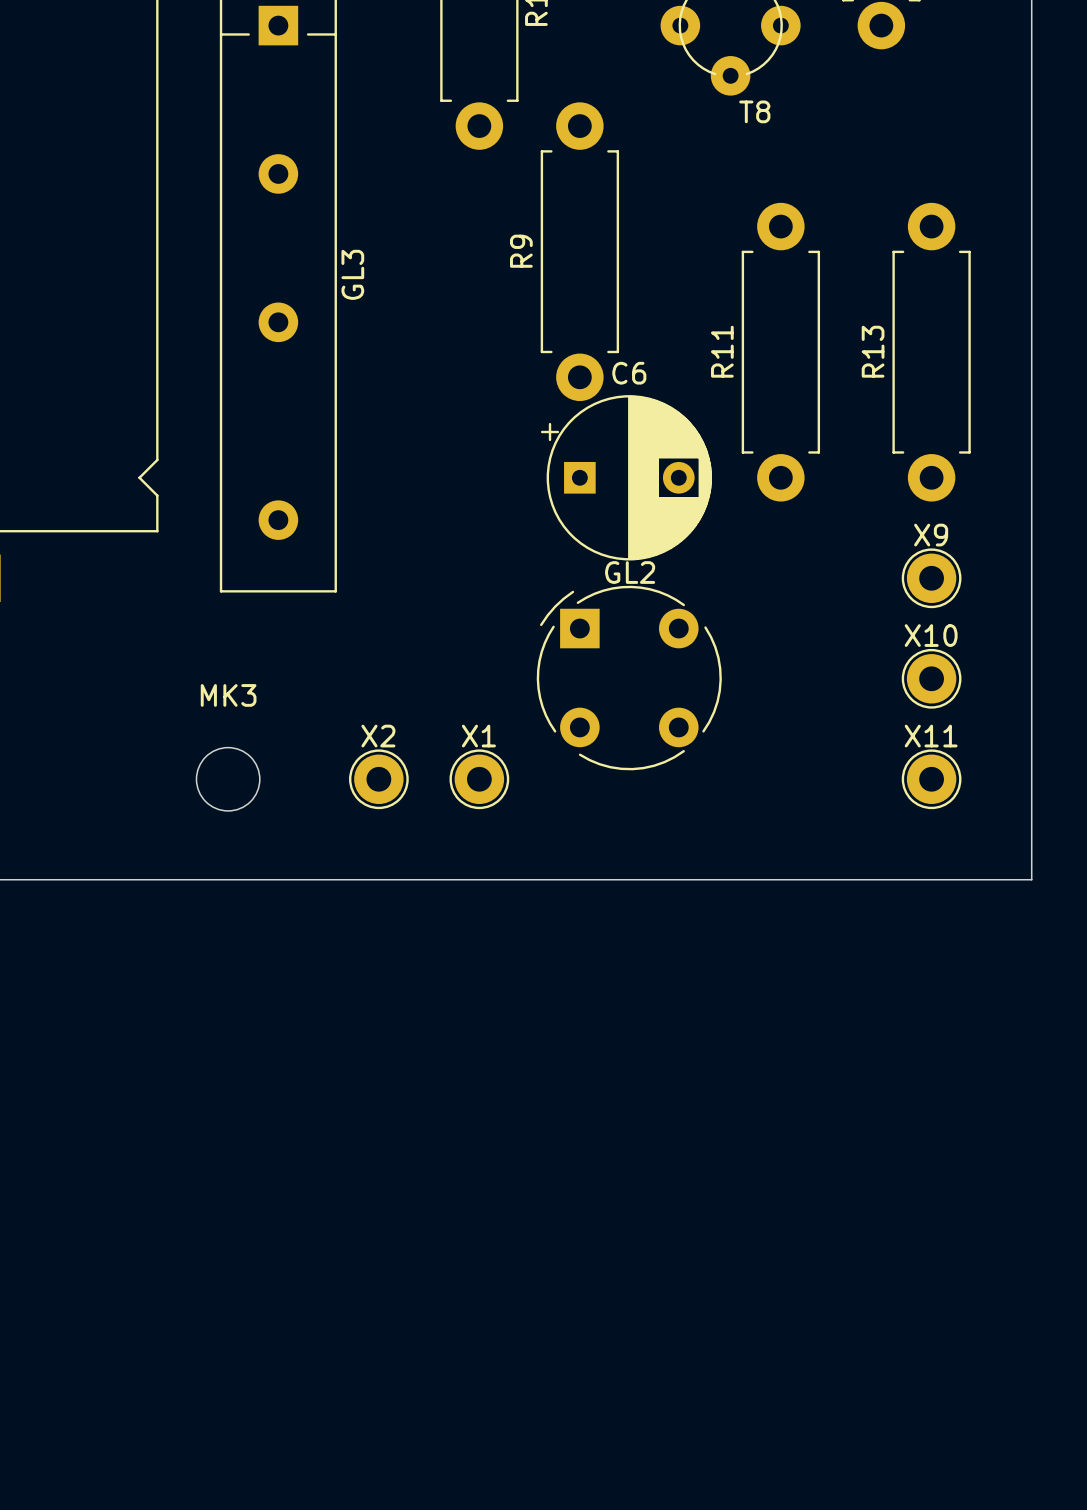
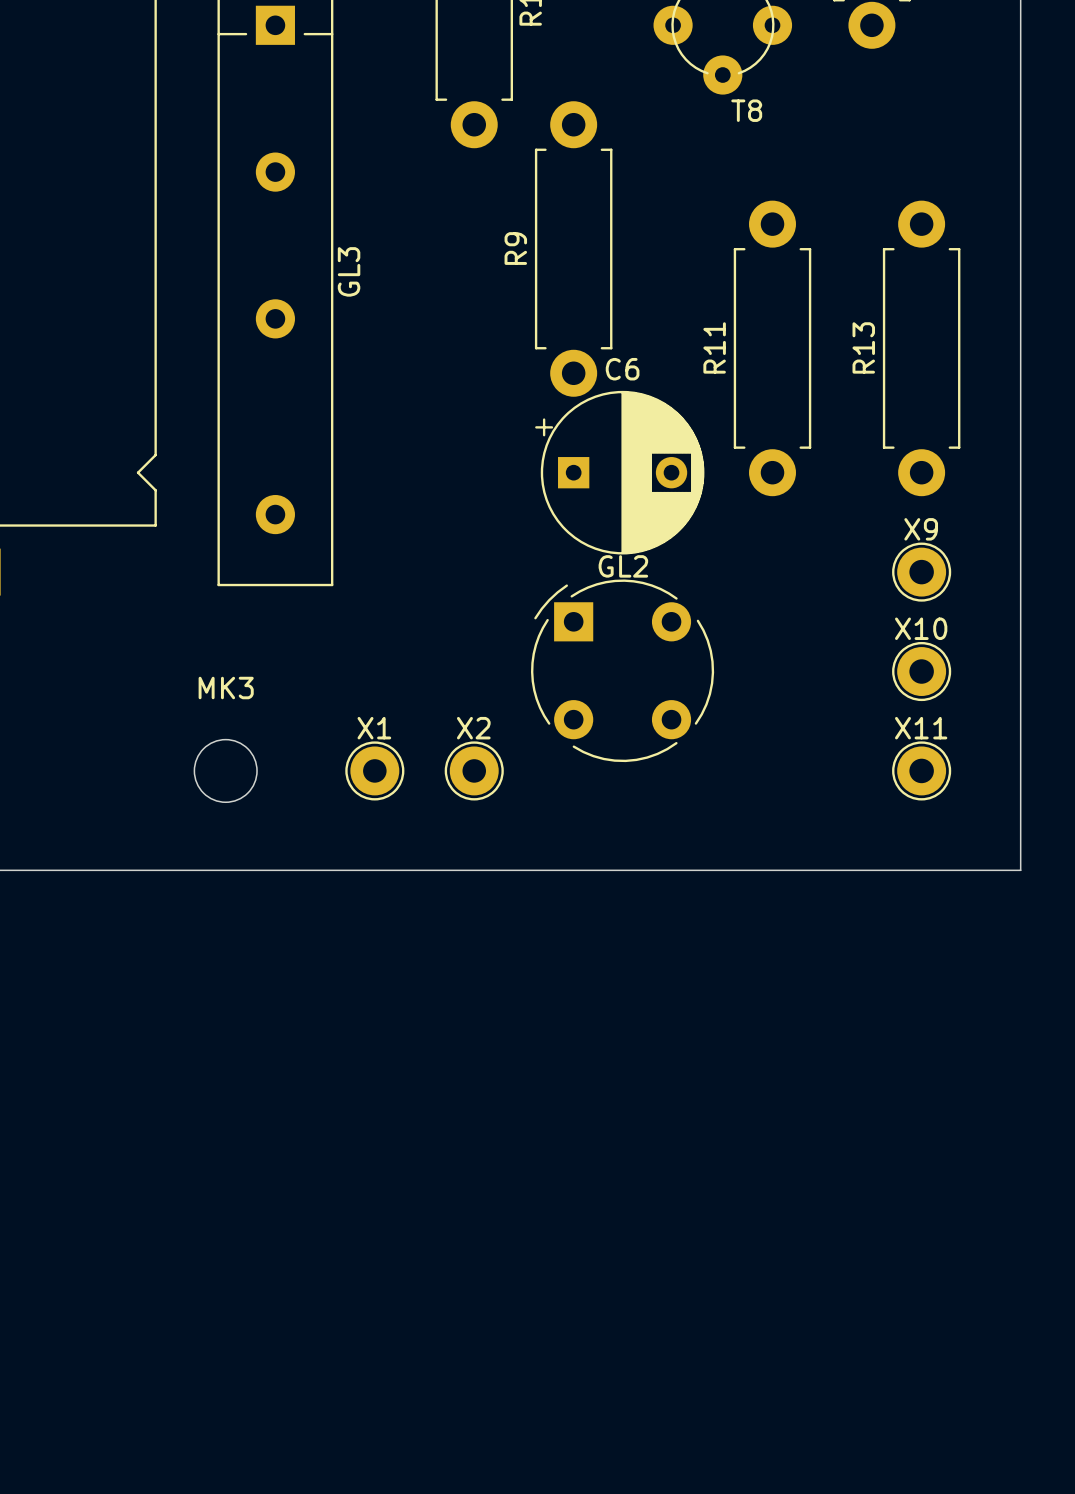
X2 footprint: [349, 749, 409, 810] -> [444, 741, 504, 801]
X1 footprint: [449, 749, 510, 810] -> [345, 741, 405, 801]

